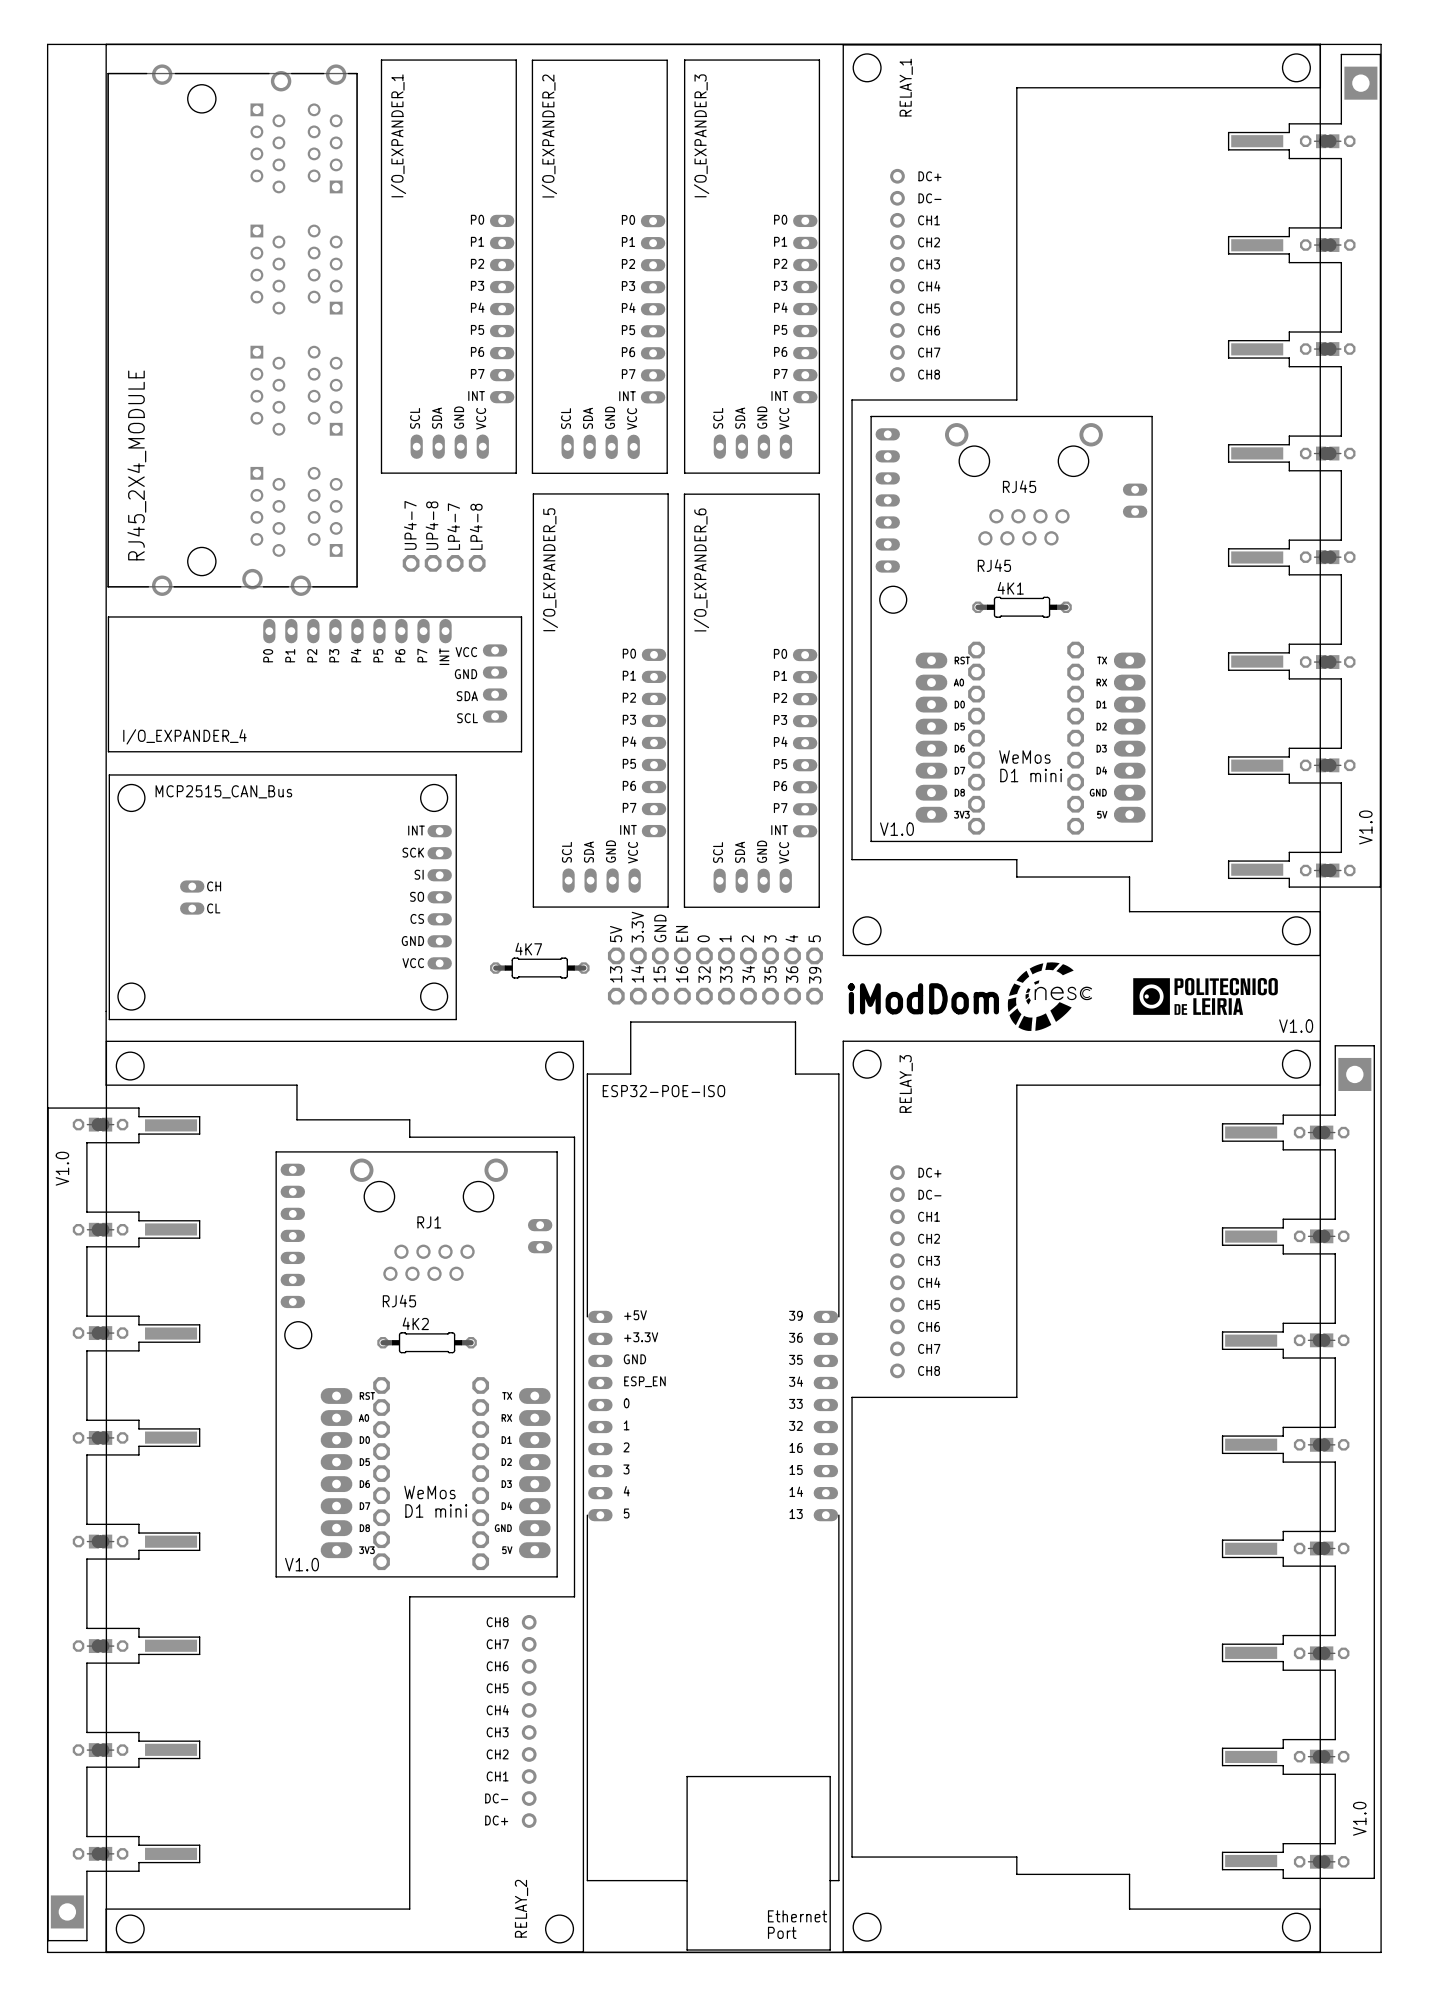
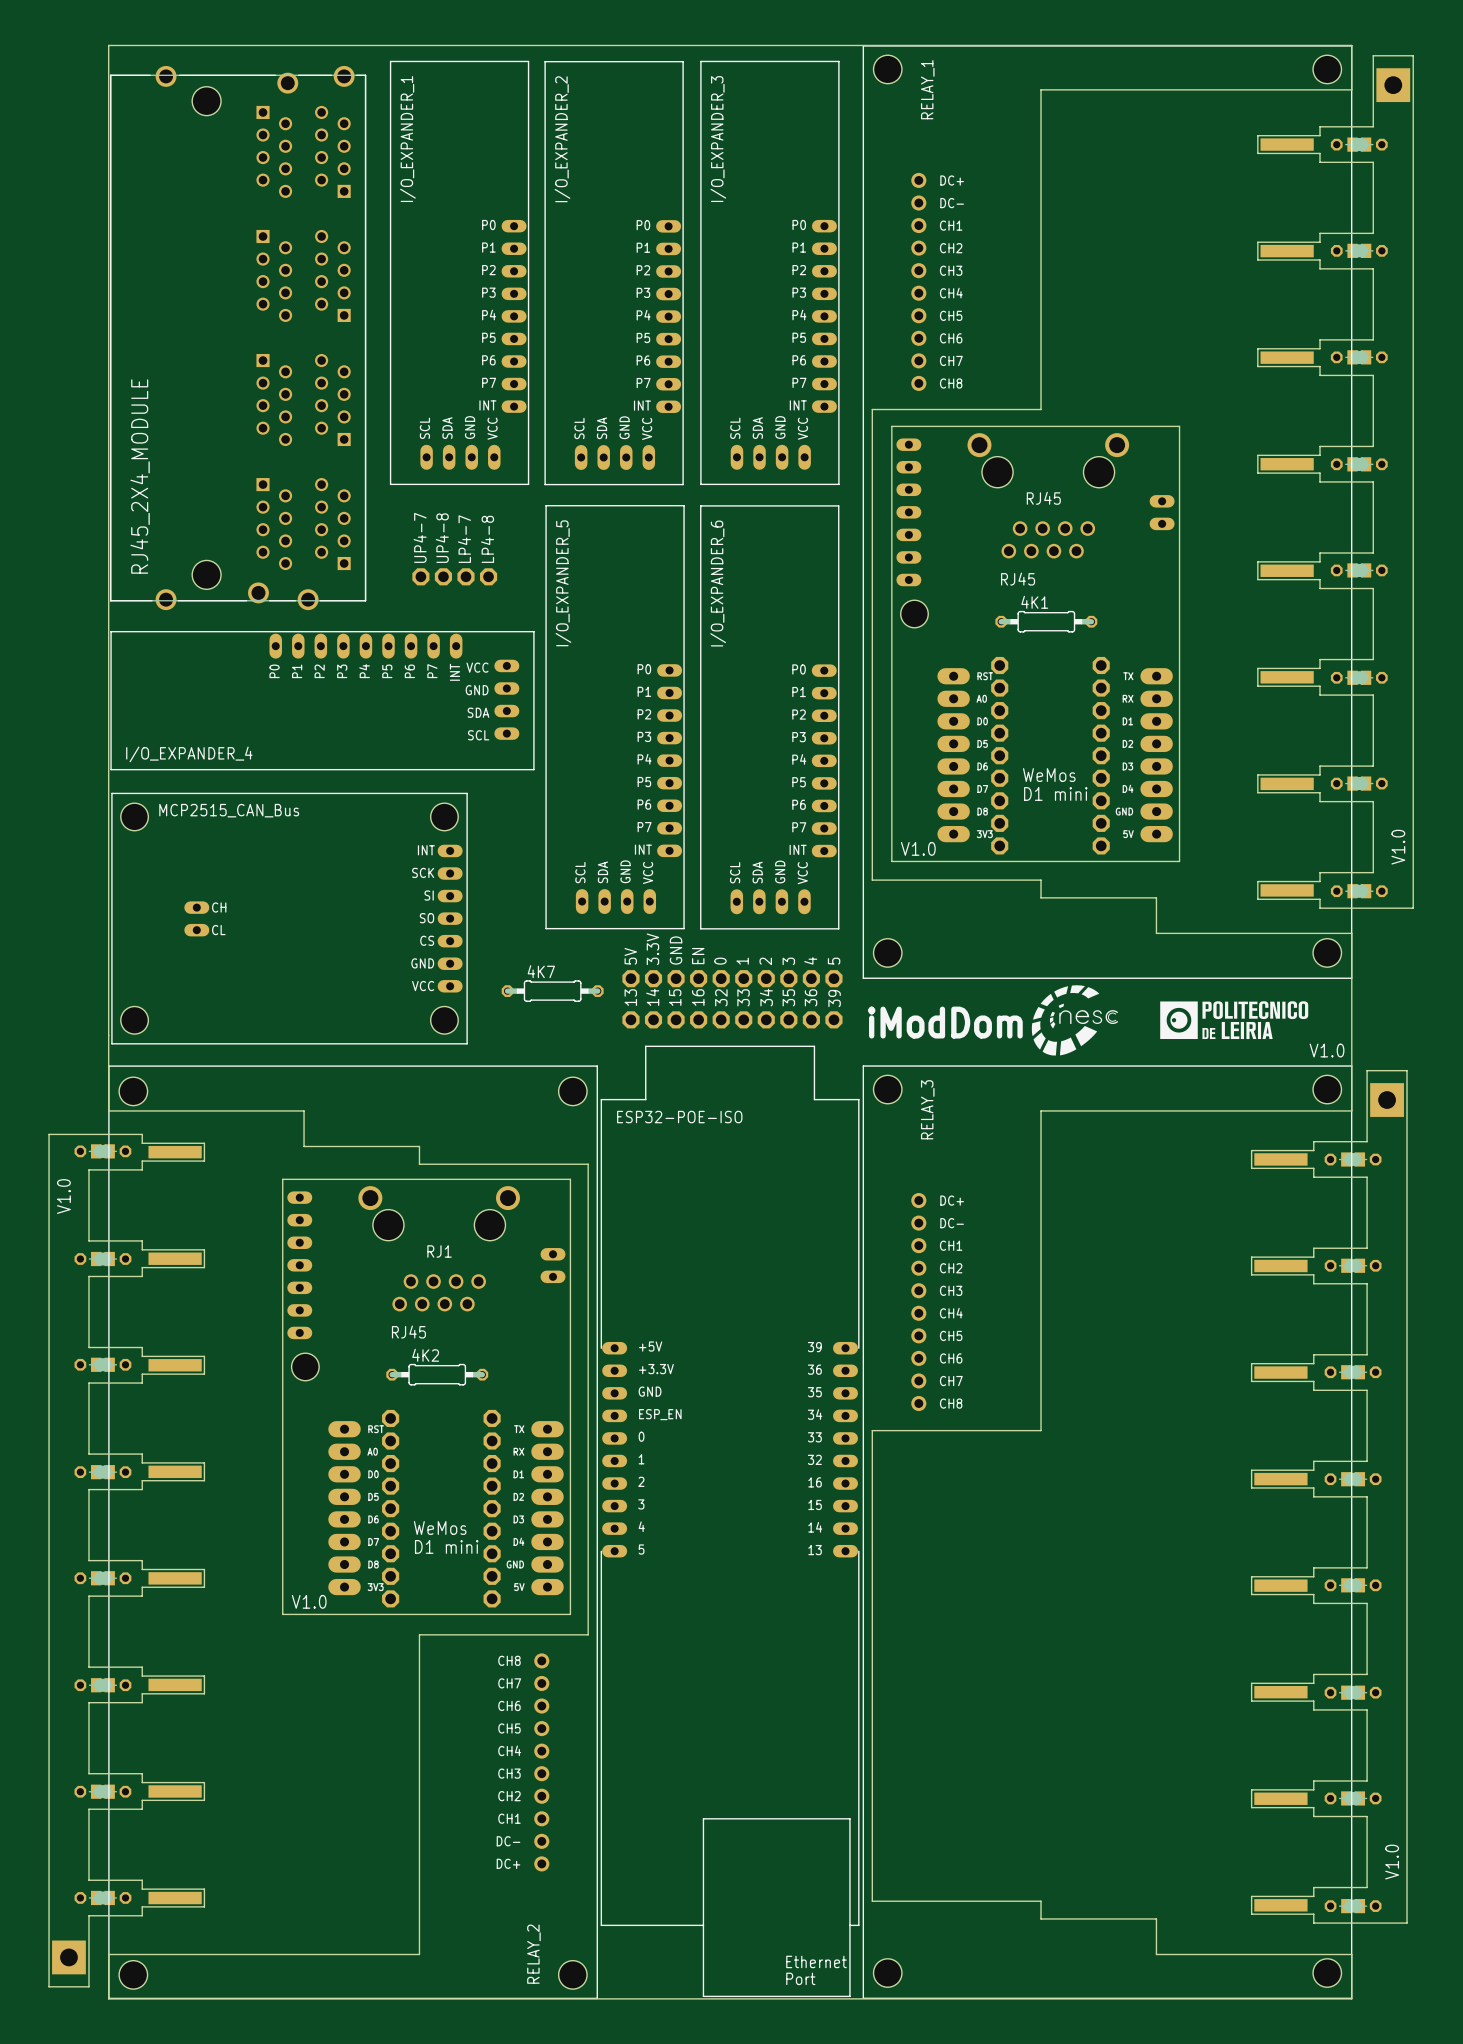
board edge: (47, 44) (47, 1952) (1381, 1952) (1381, 44) (47, 44) -> none

